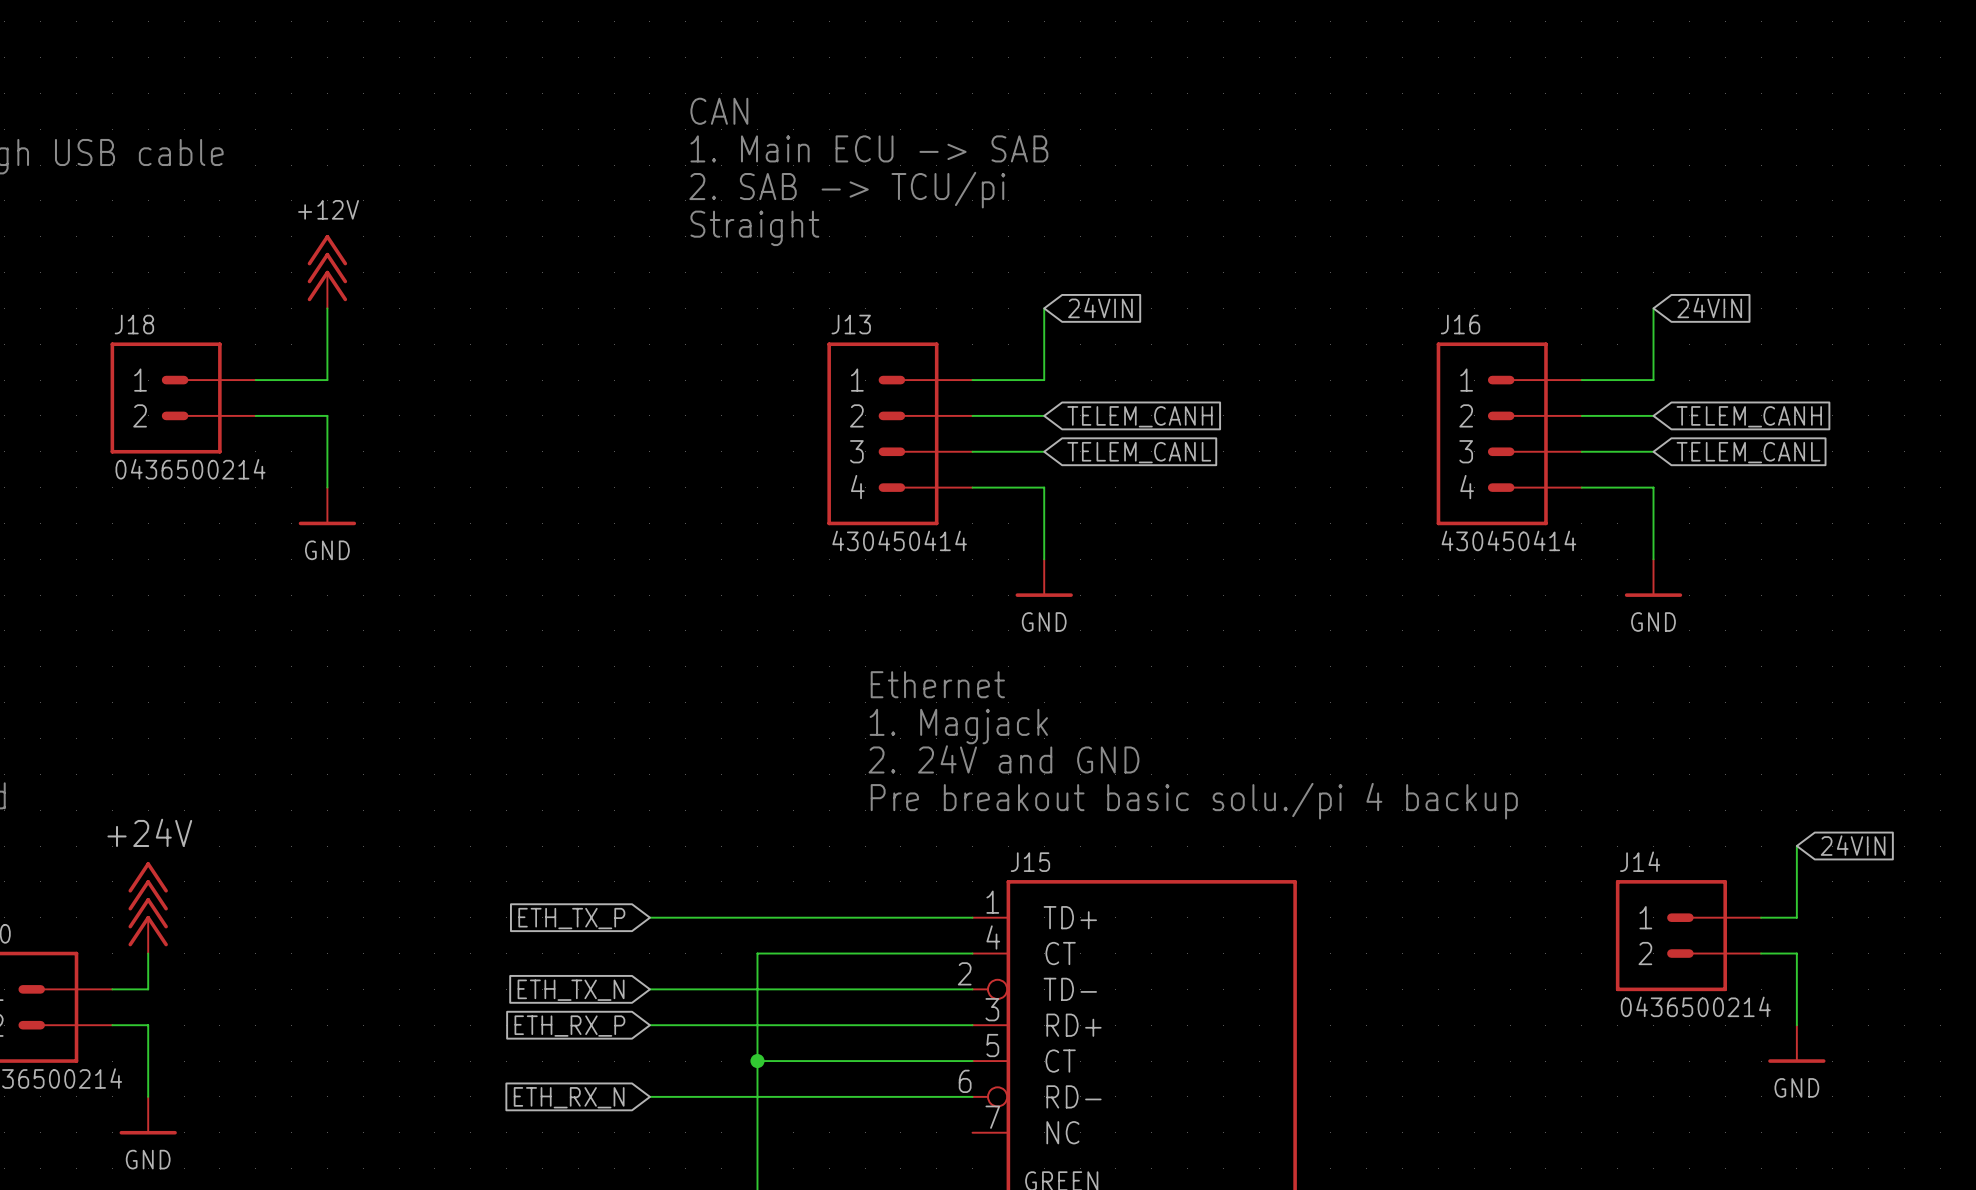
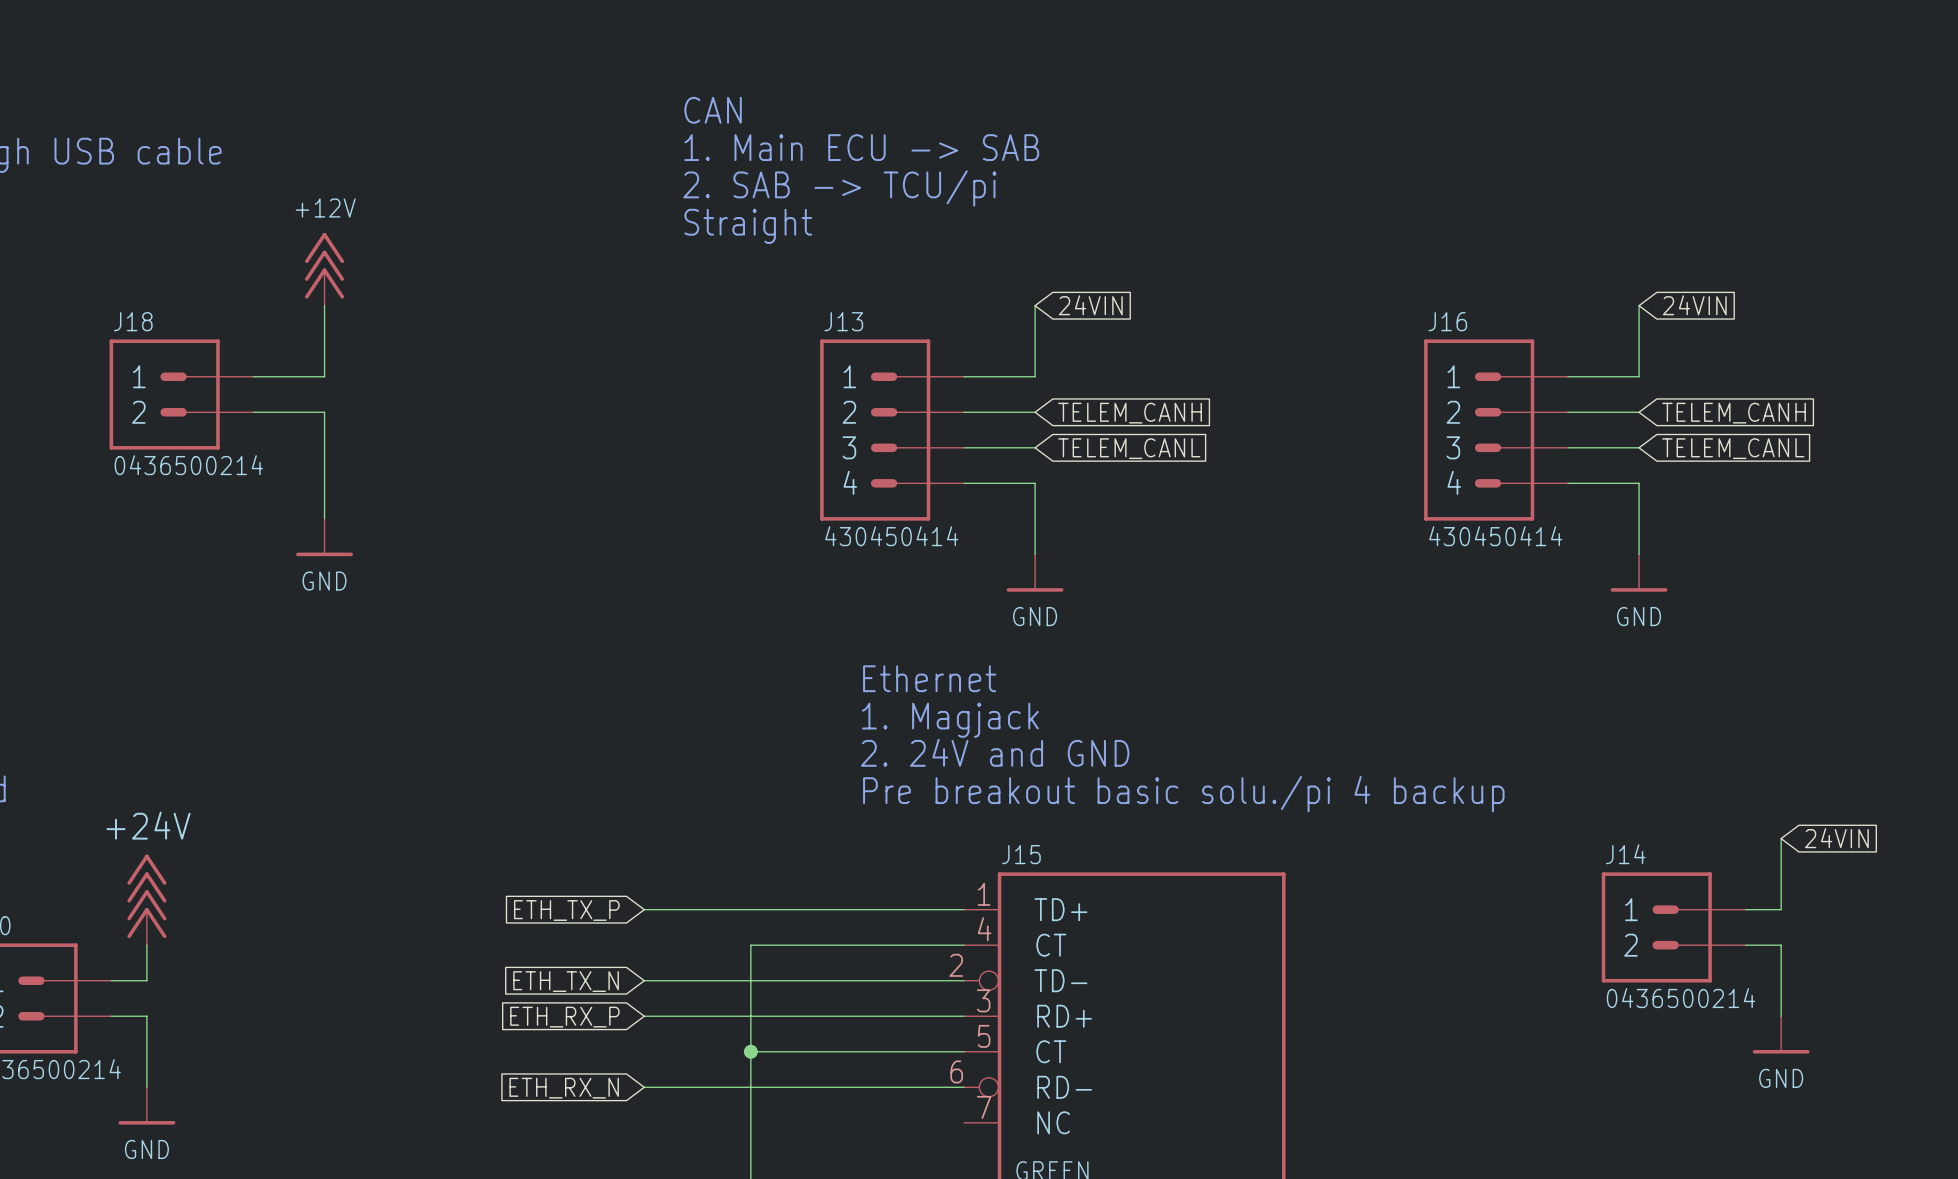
power symbol position: GND (327, 506) -> GND (324, 537)

